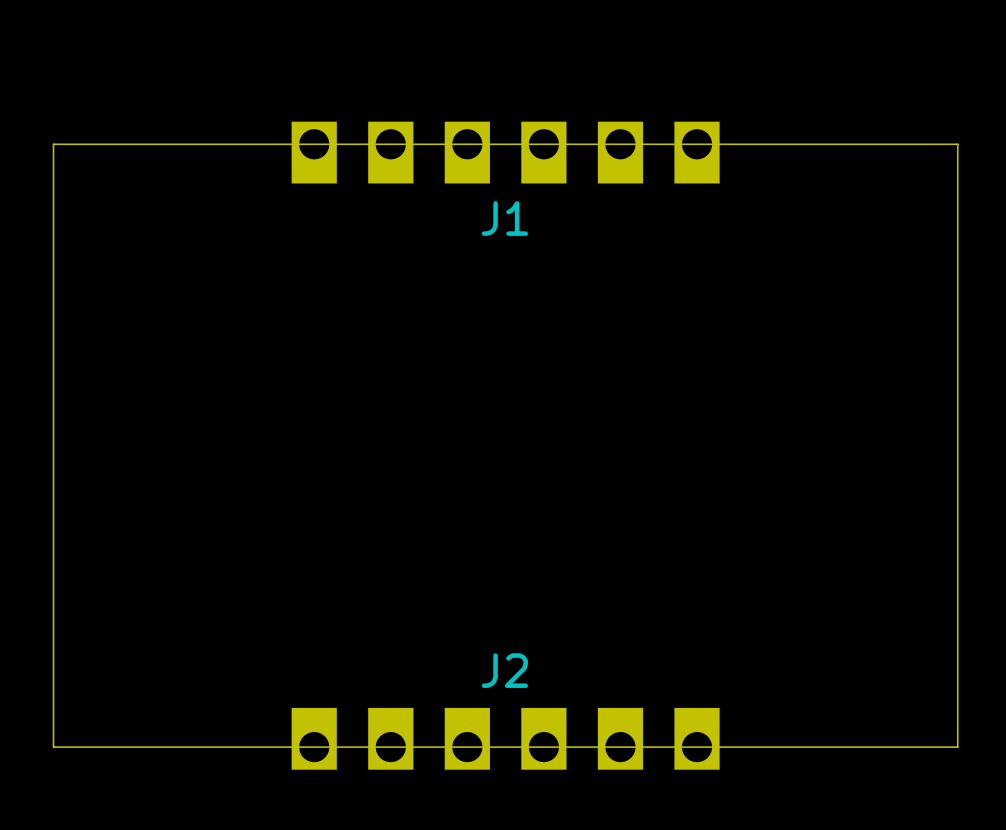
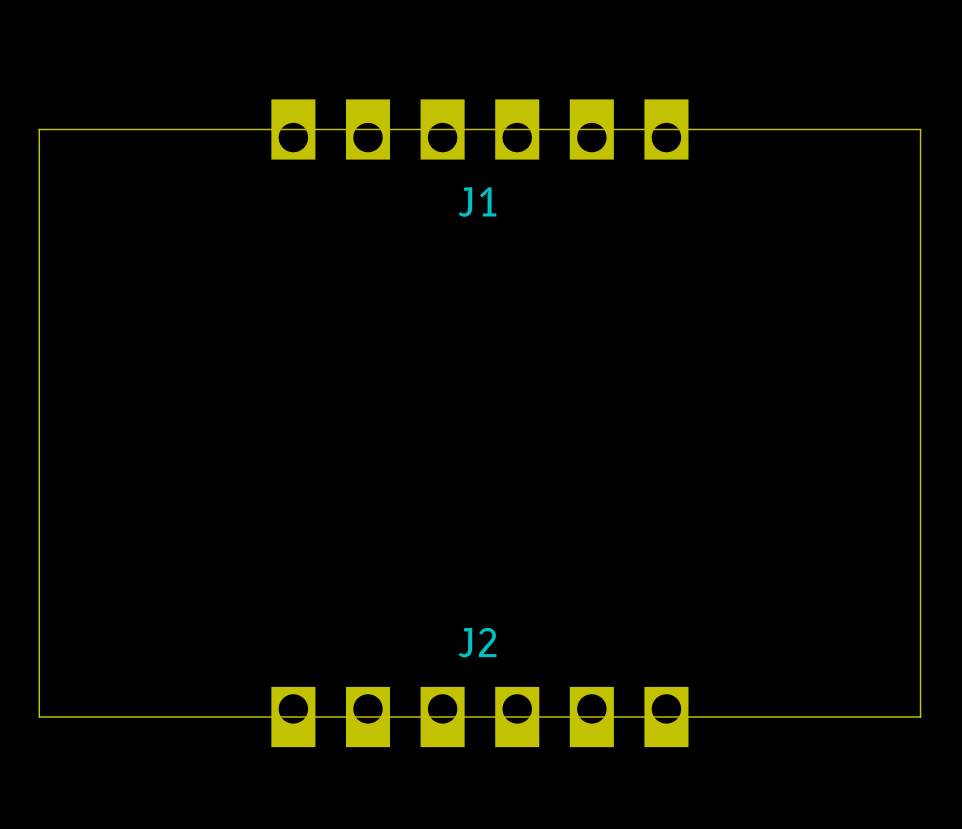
J1 rotation: 0° (505, 152) -> 180° (479, 129)
J2 rotation: 0° (505, 738) -> 180° (479, 717)

